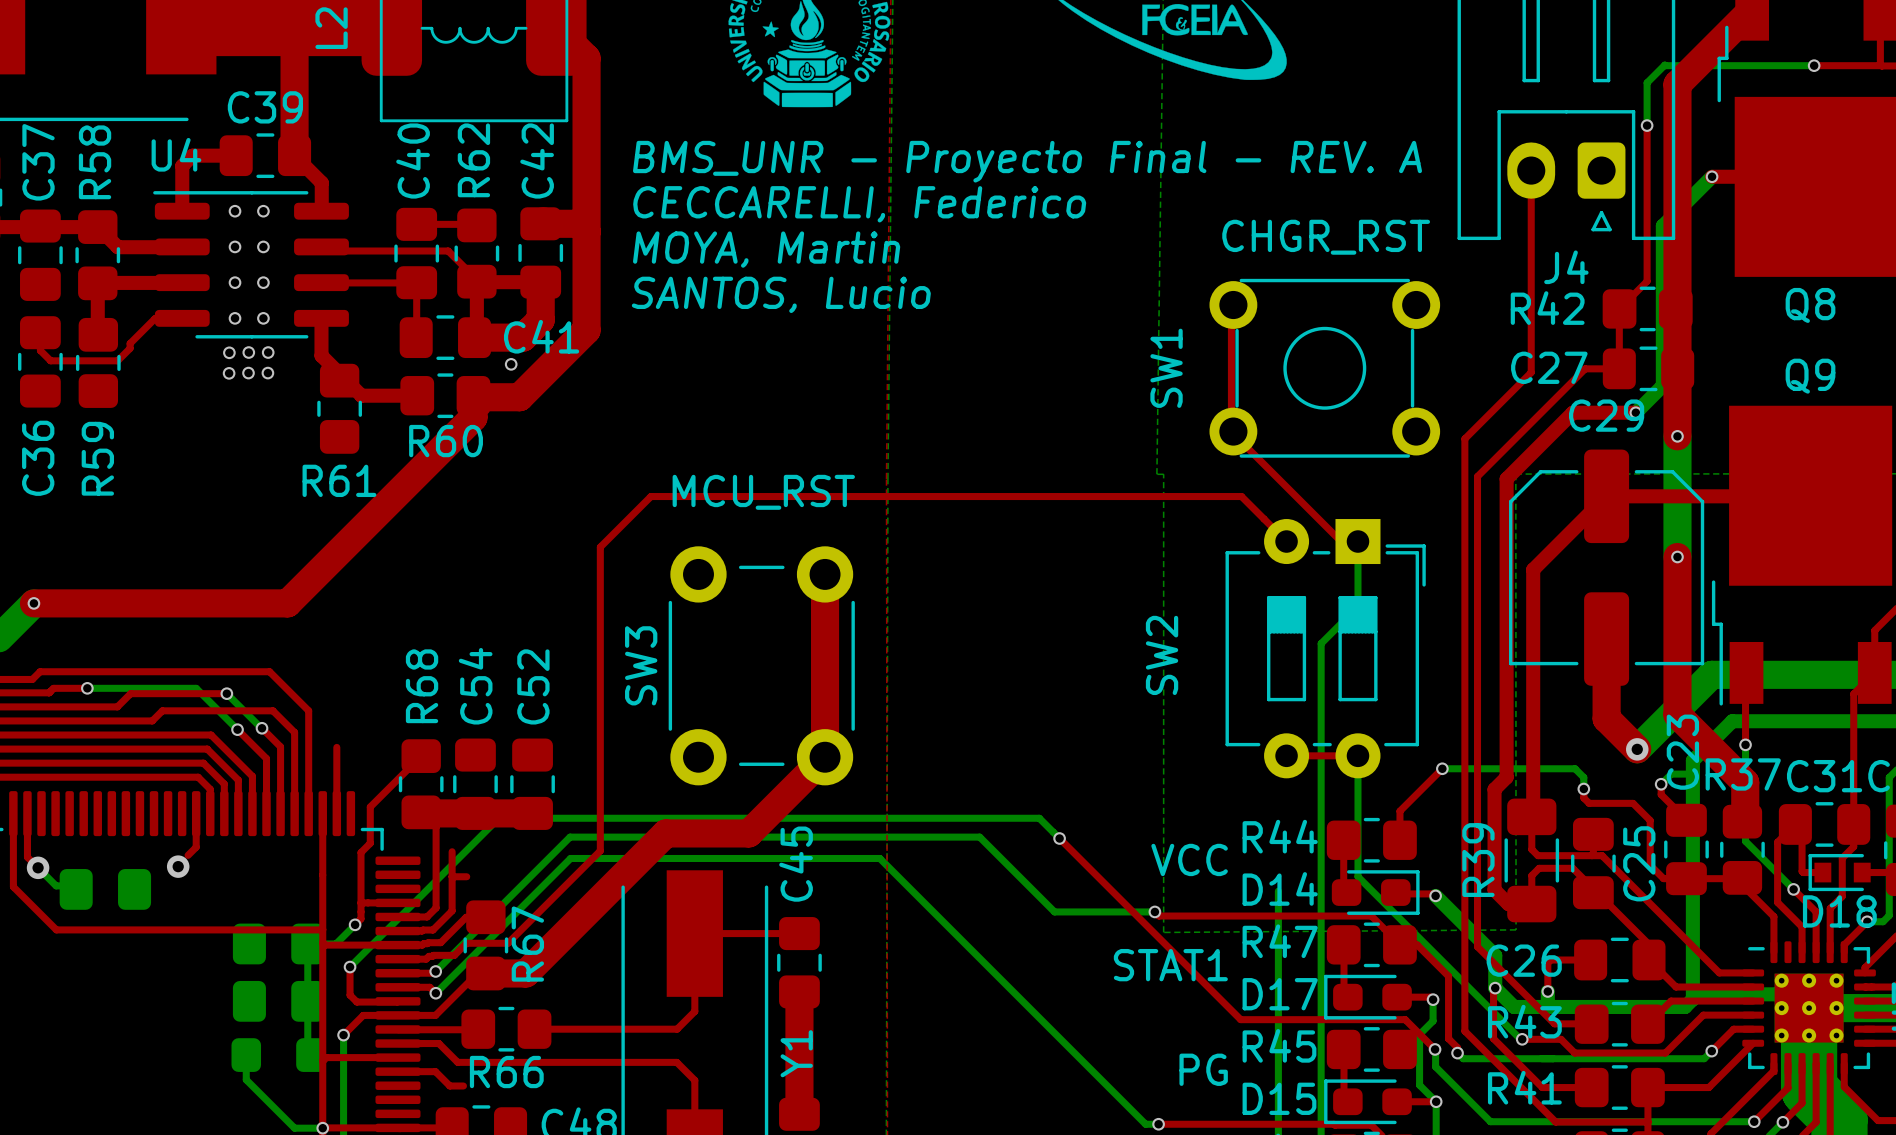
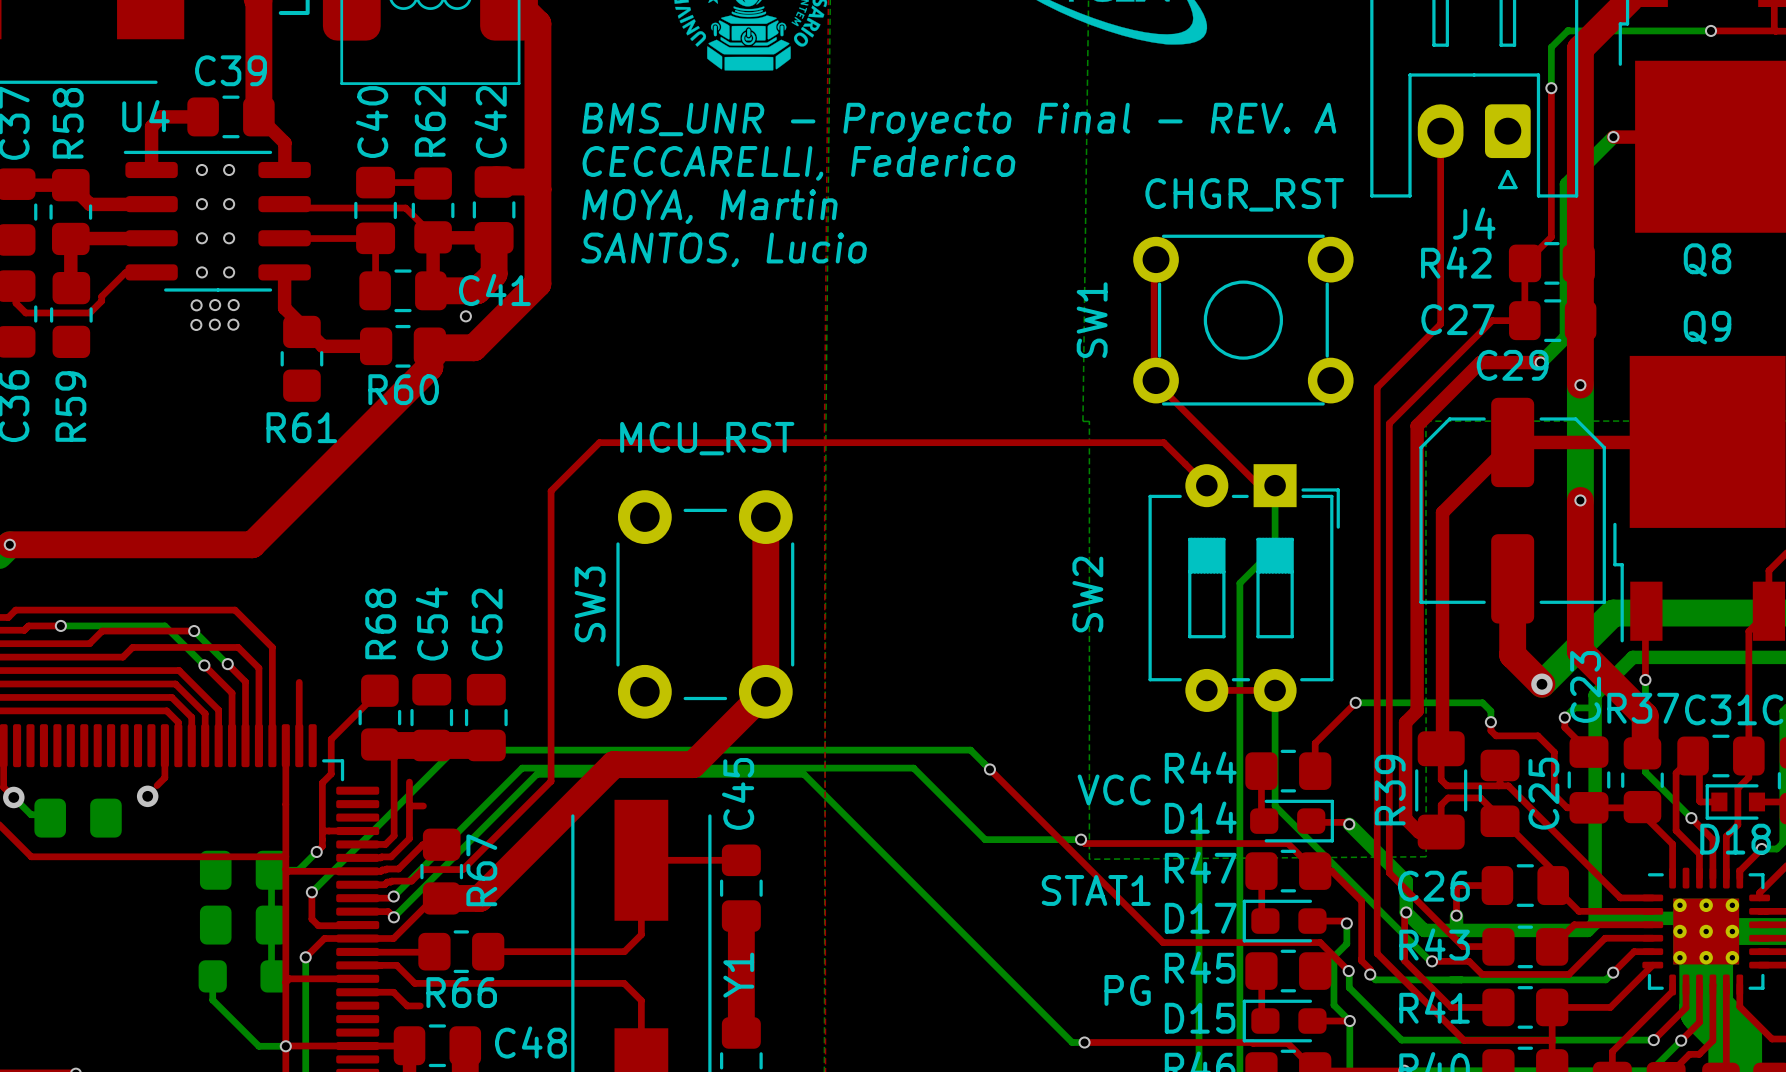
bottom track: (570, 858) (879, 858) -> (522, 788) (536, 774) (803, 774) (818, 788)

